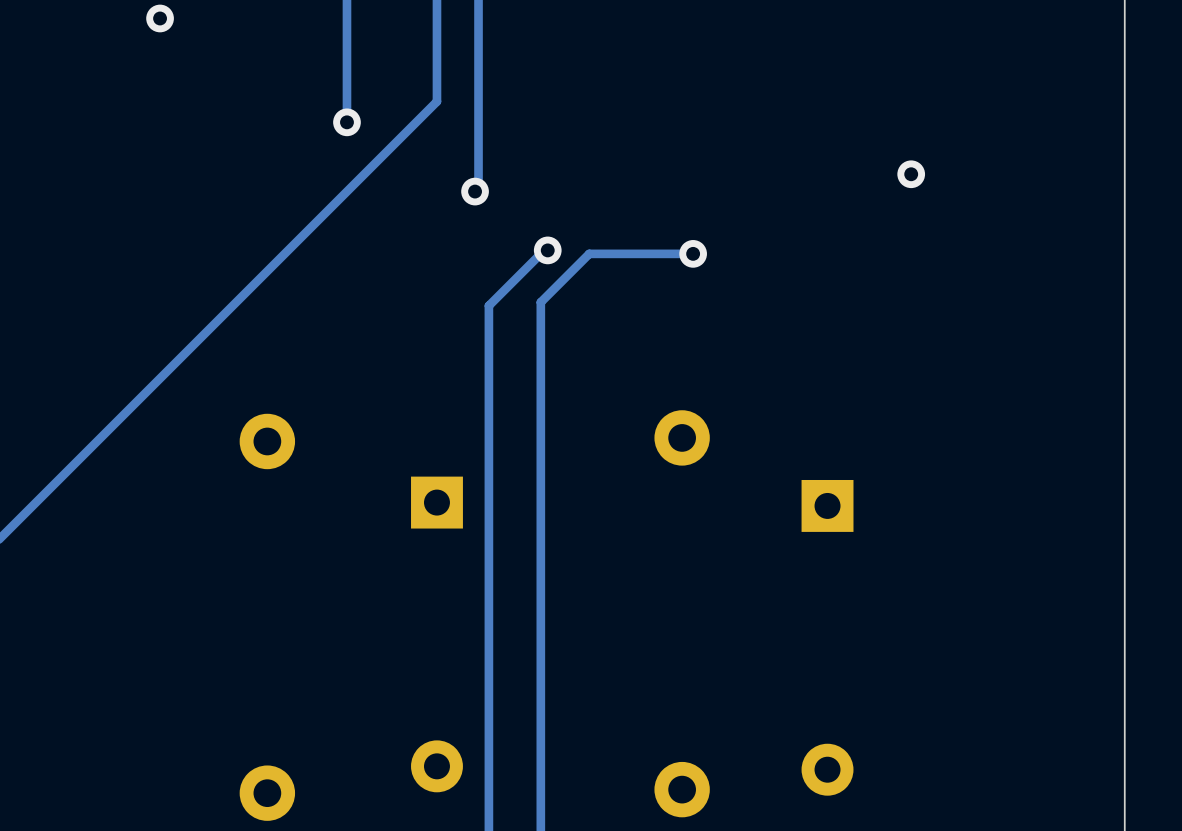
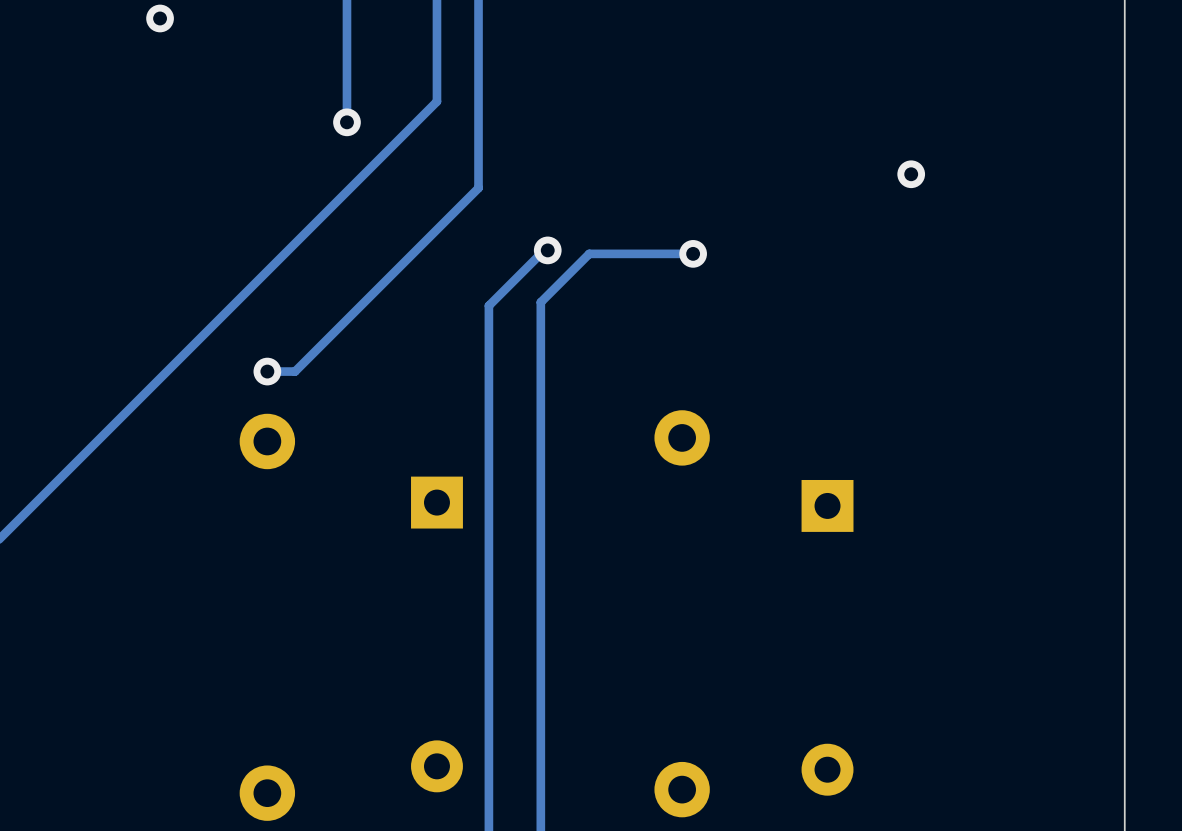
track: none -> (475, 191) (295, 371) (267, 371)
via: (475, 191) -> none
via: none -> (267, 371)

